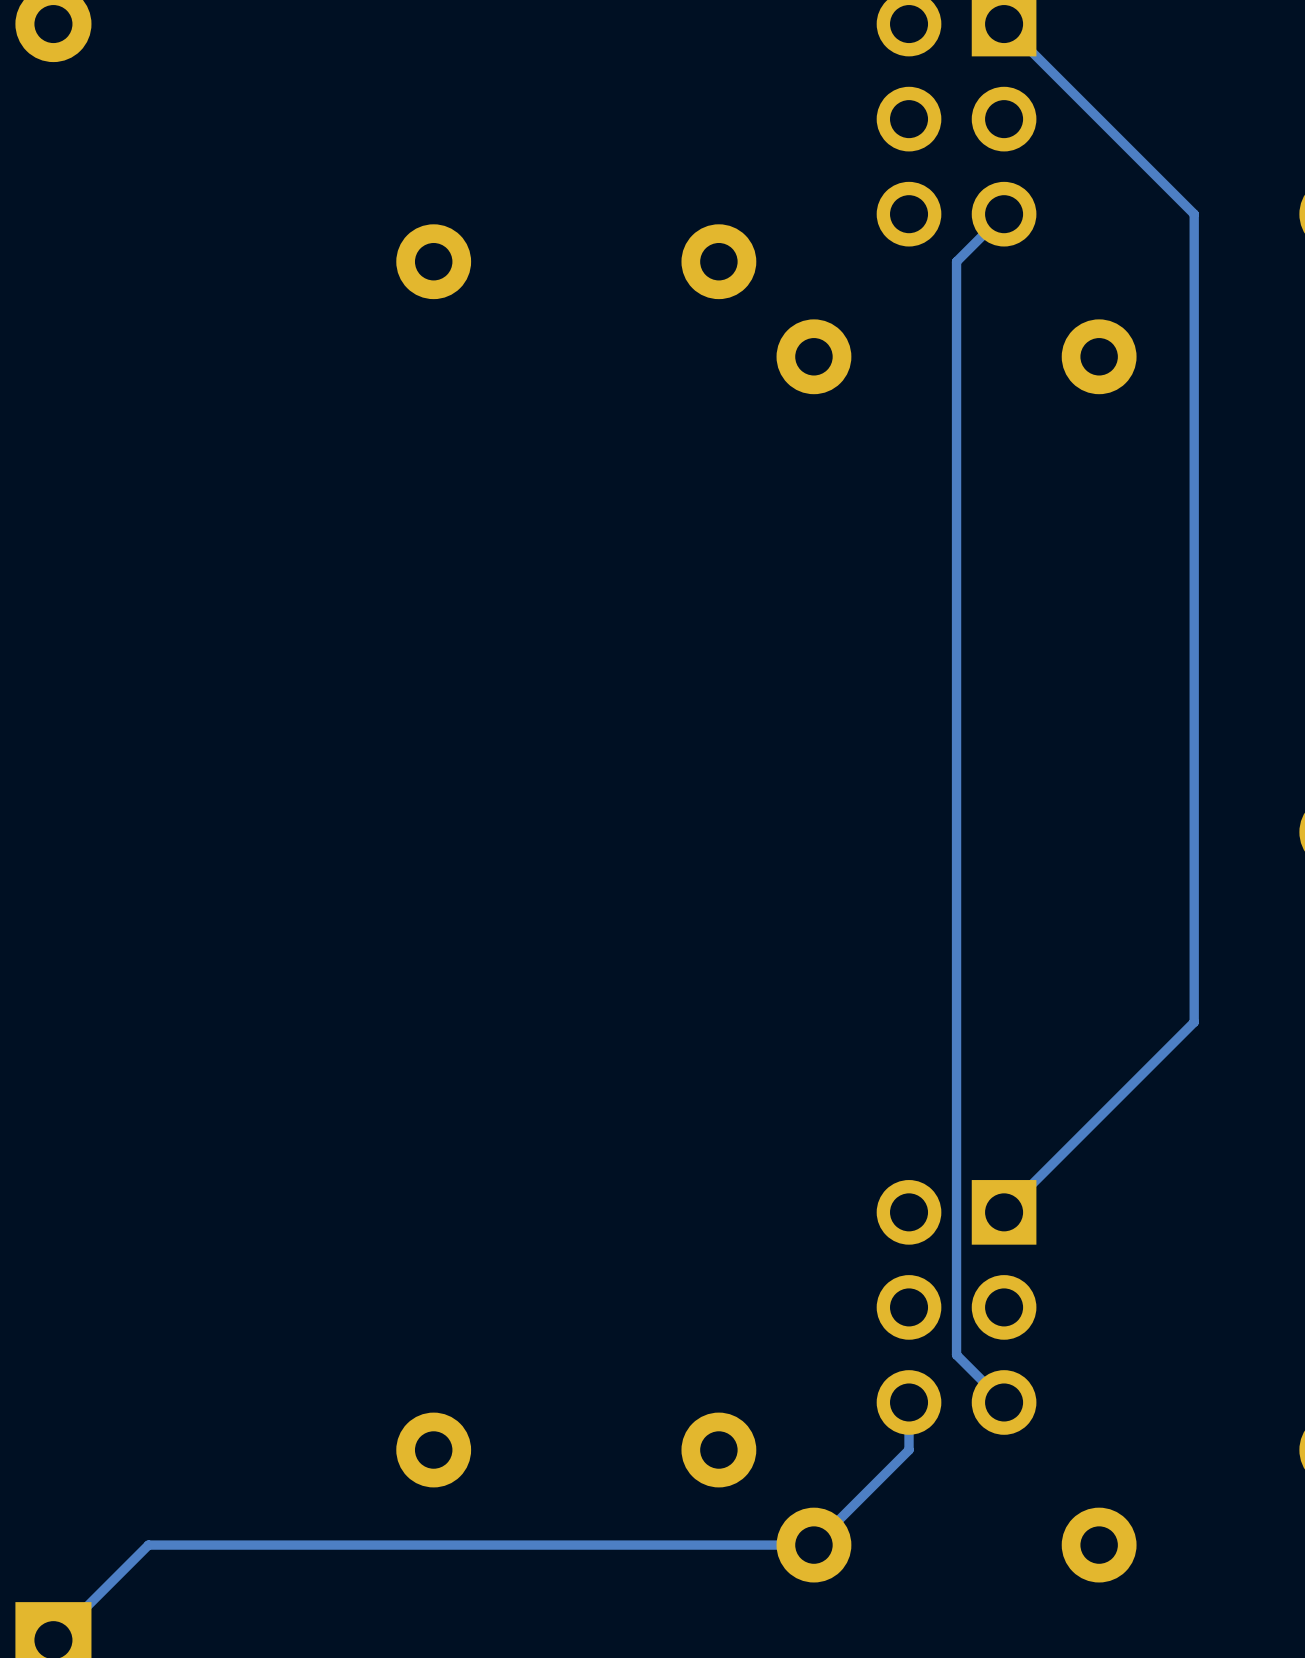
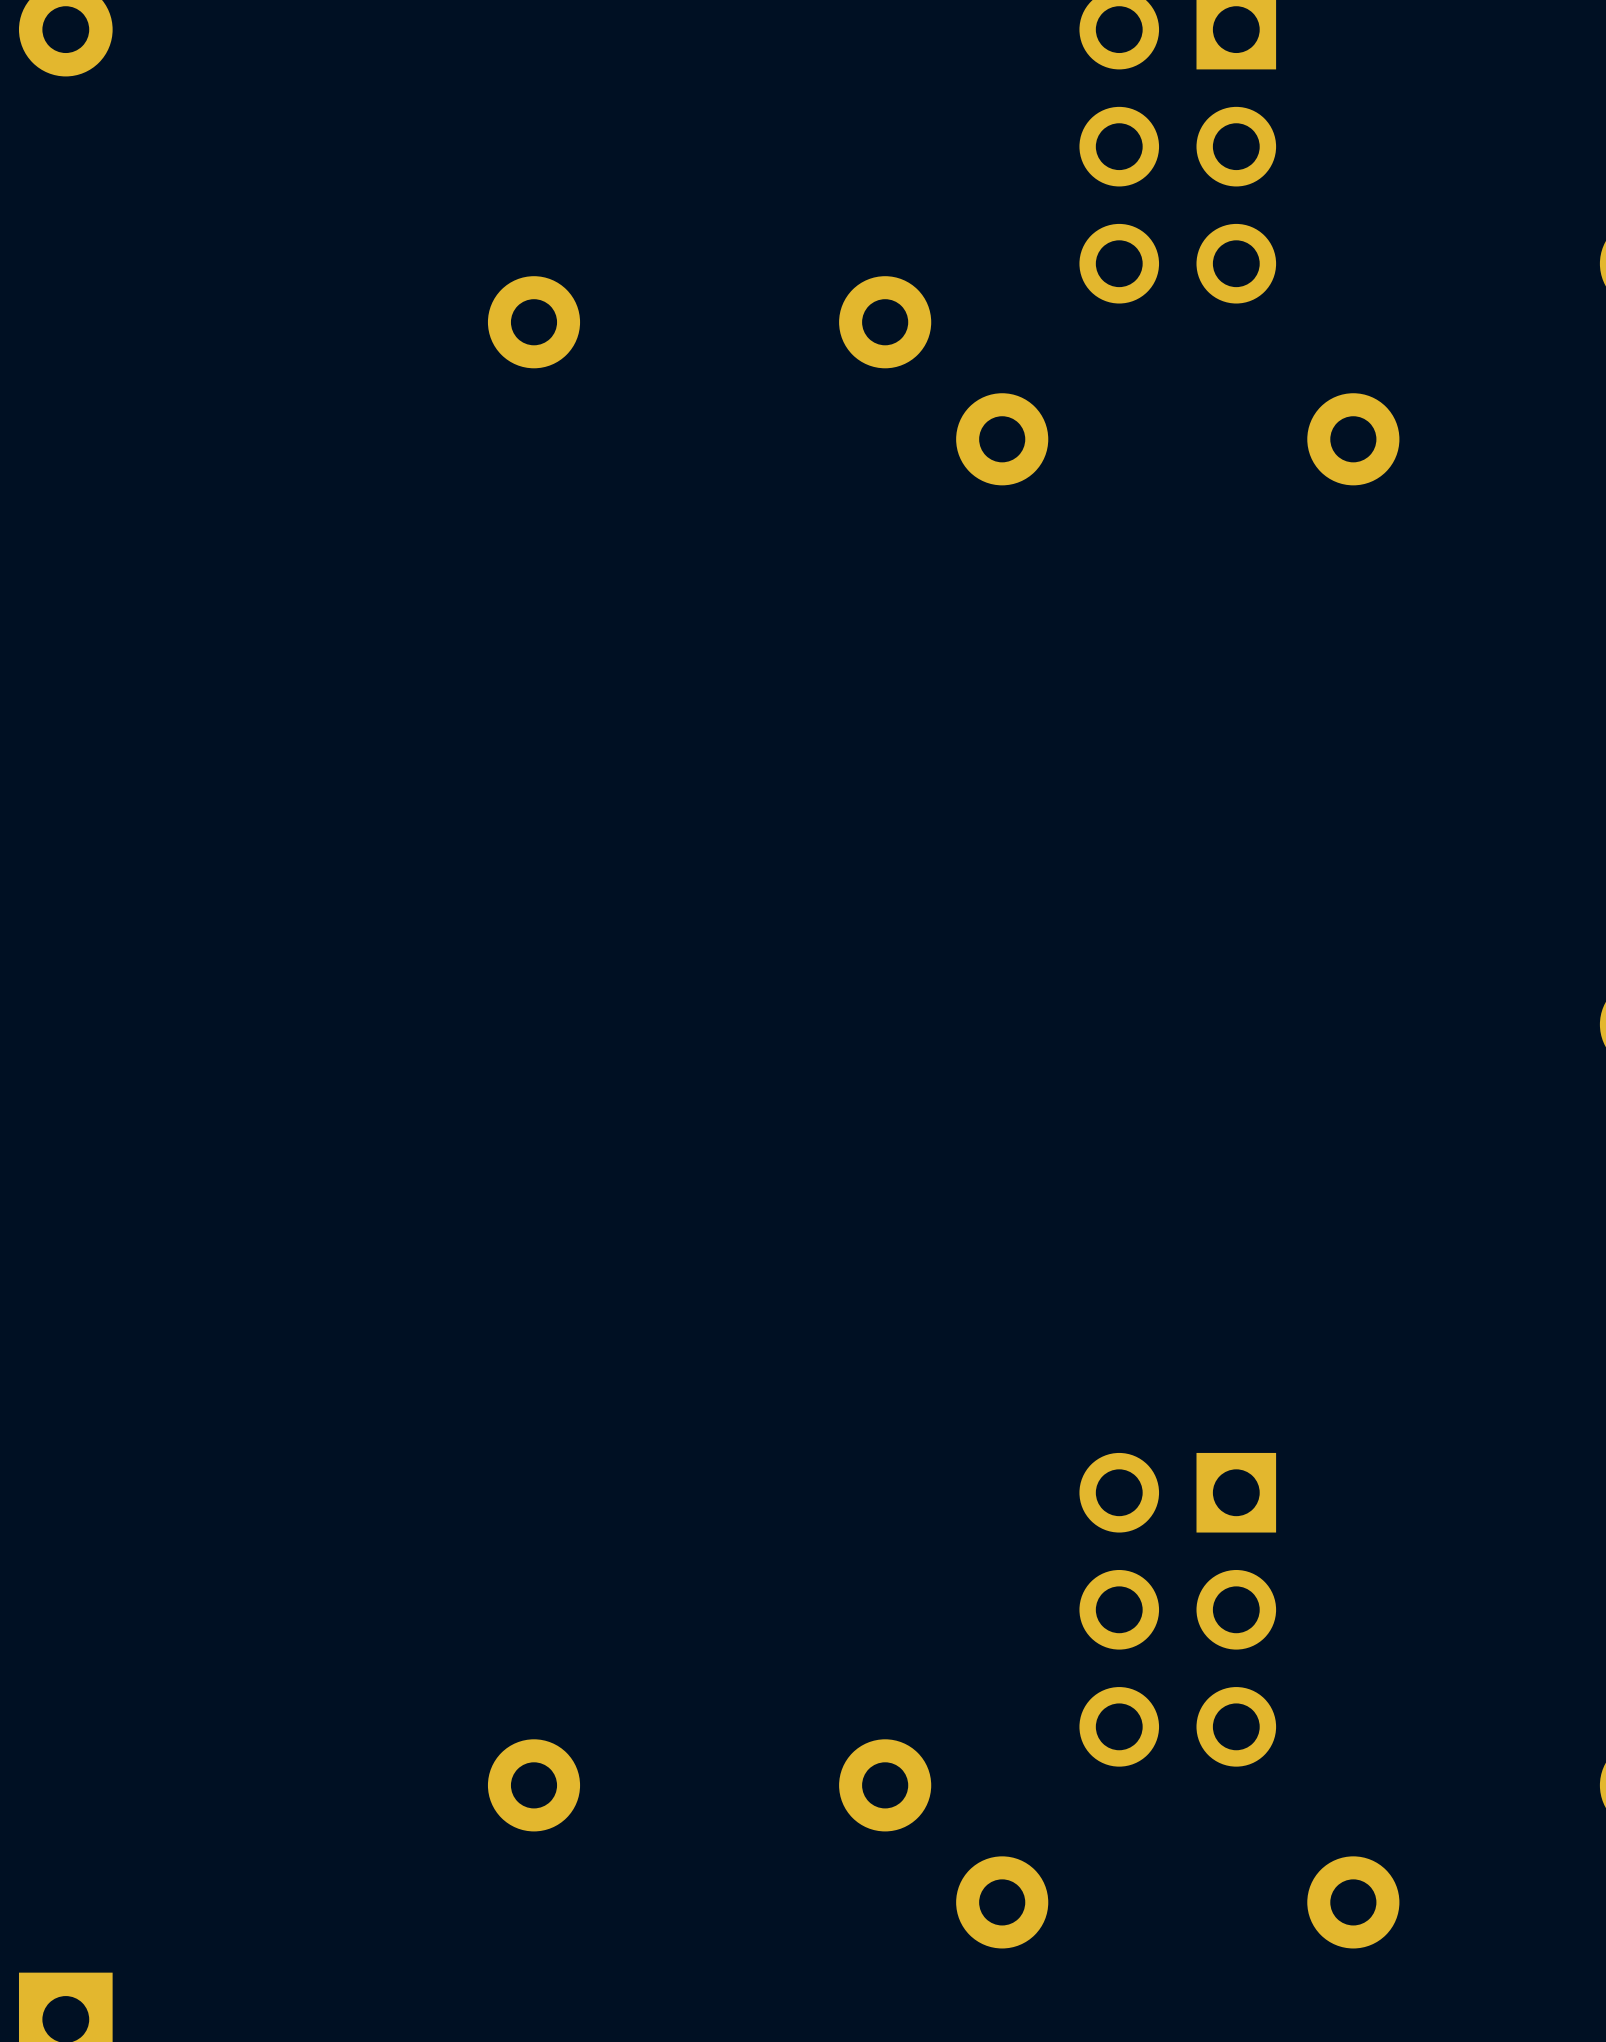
track: (1004, 24) (1194, 214) (1194, 1022) (1004, 1212) -> none
track: (1004, 214) (956, 261) (956, 1354) (1004, 1402) -> none
track: (909, 1402) (909, 1450) (813, 1545) (148, 1545) (53, 1640) -> none

